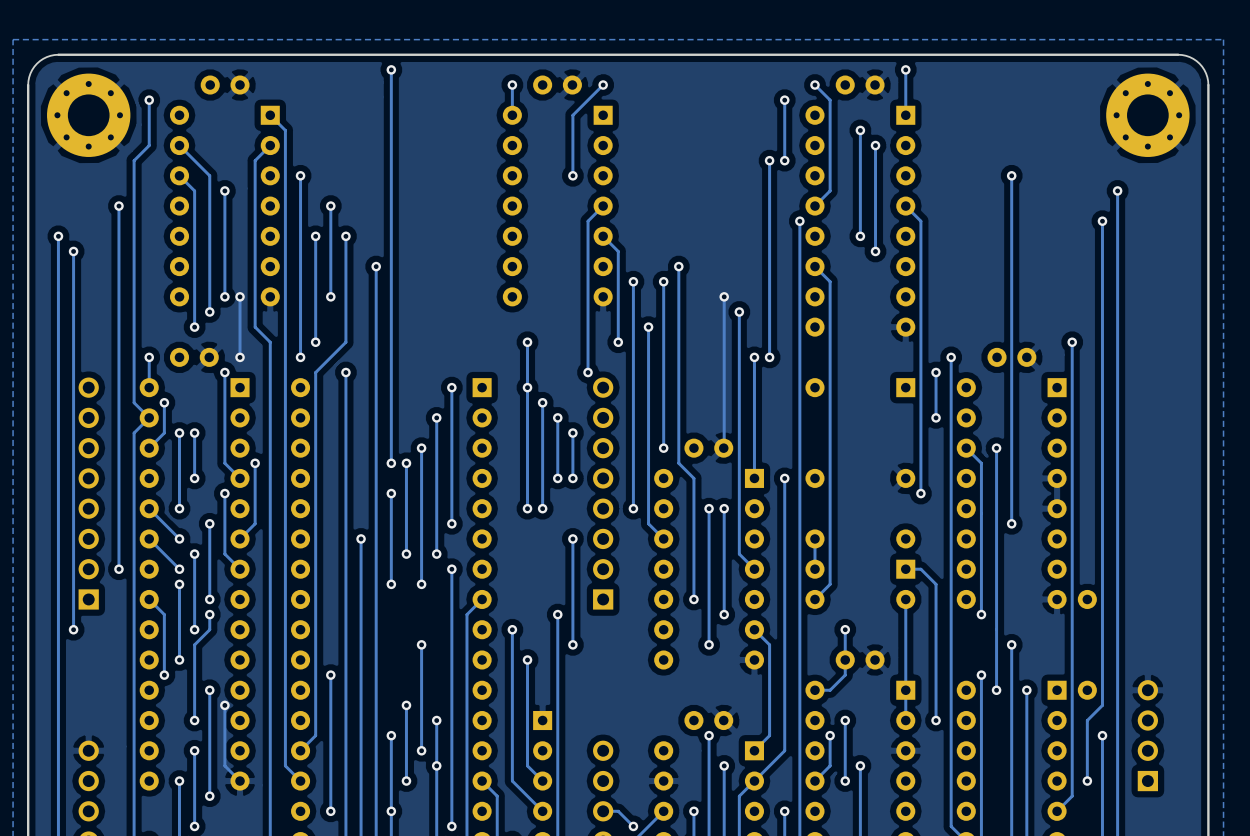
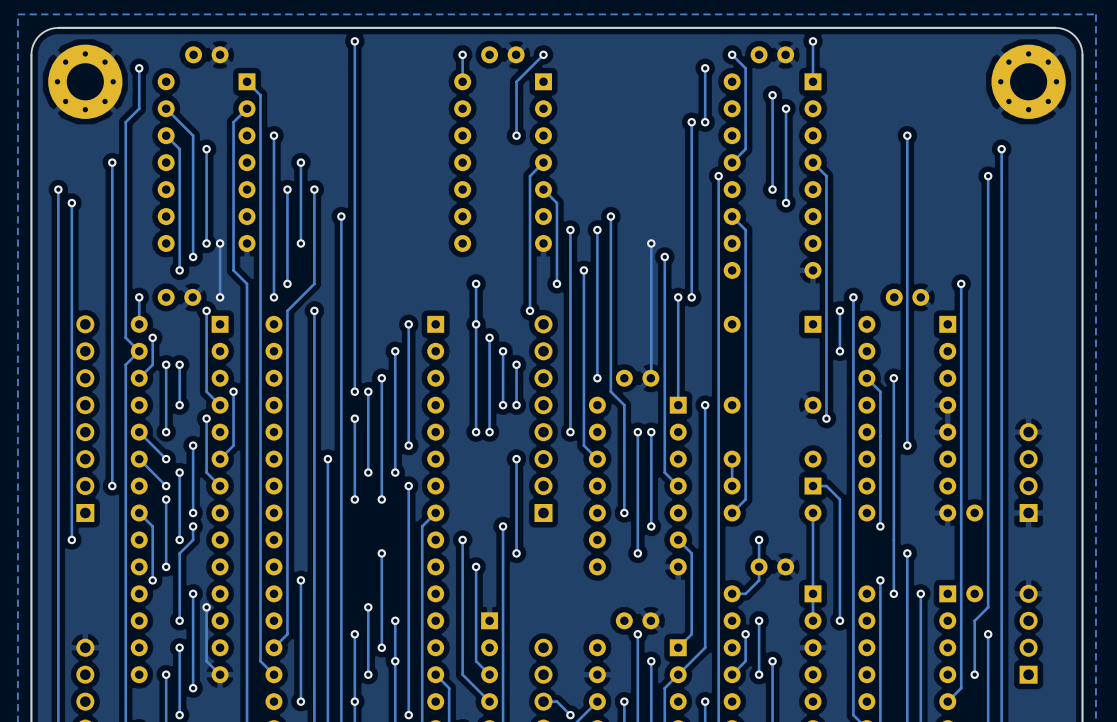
part: none -> (1028, 472)

